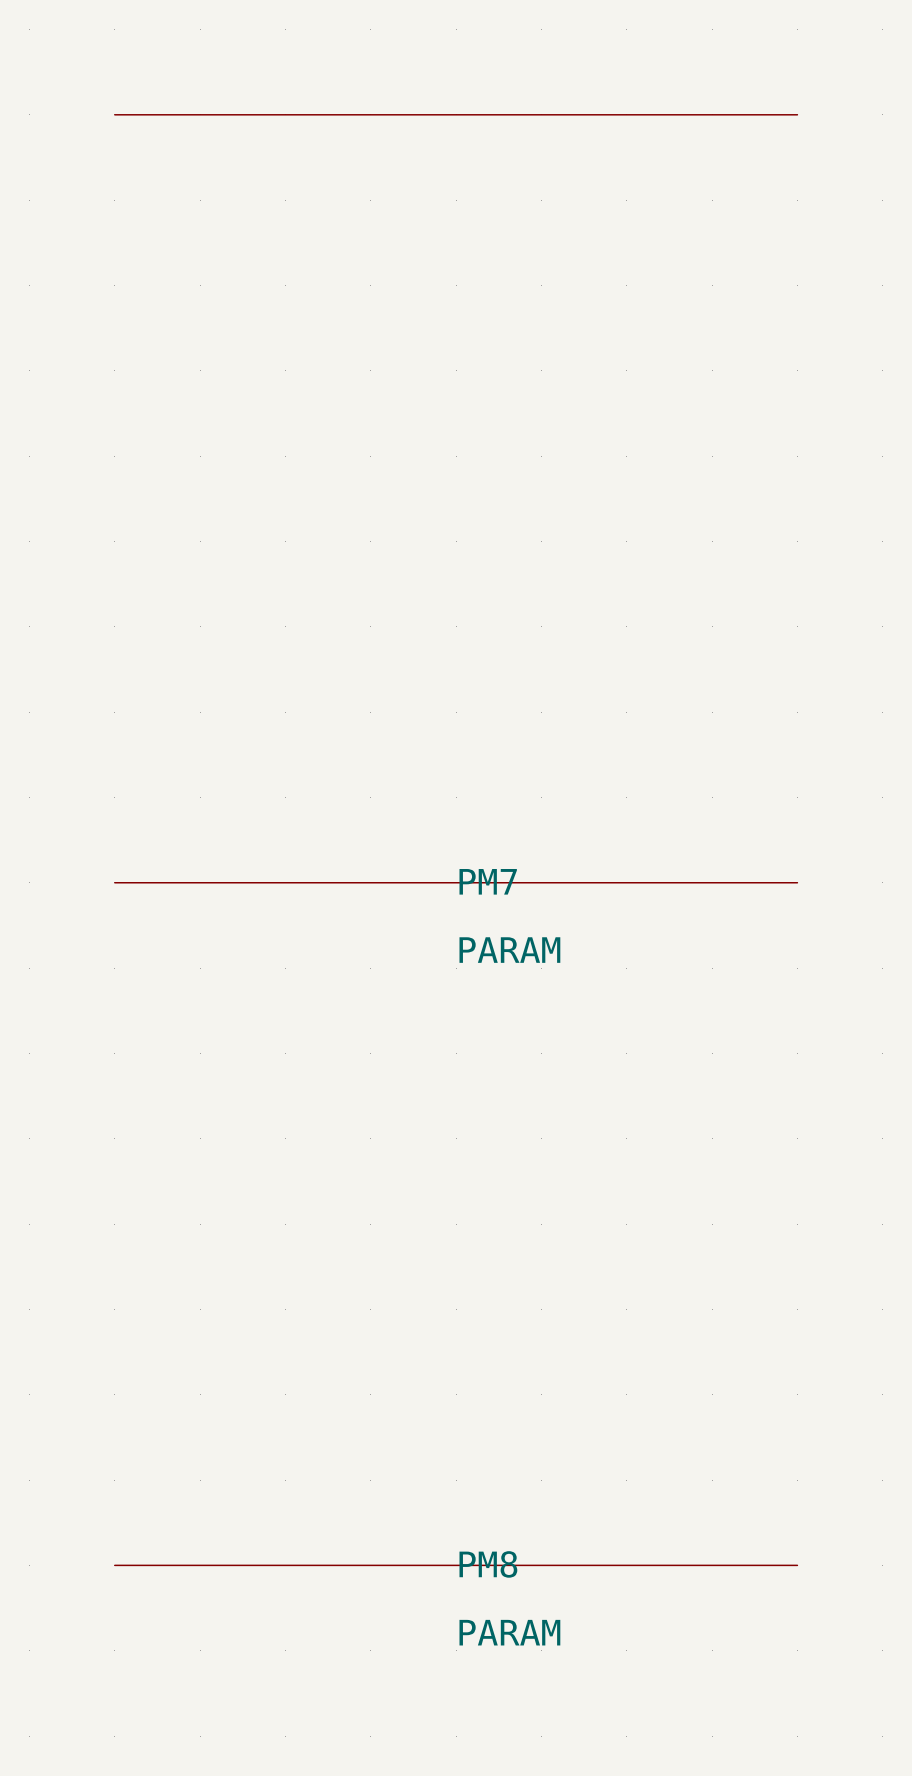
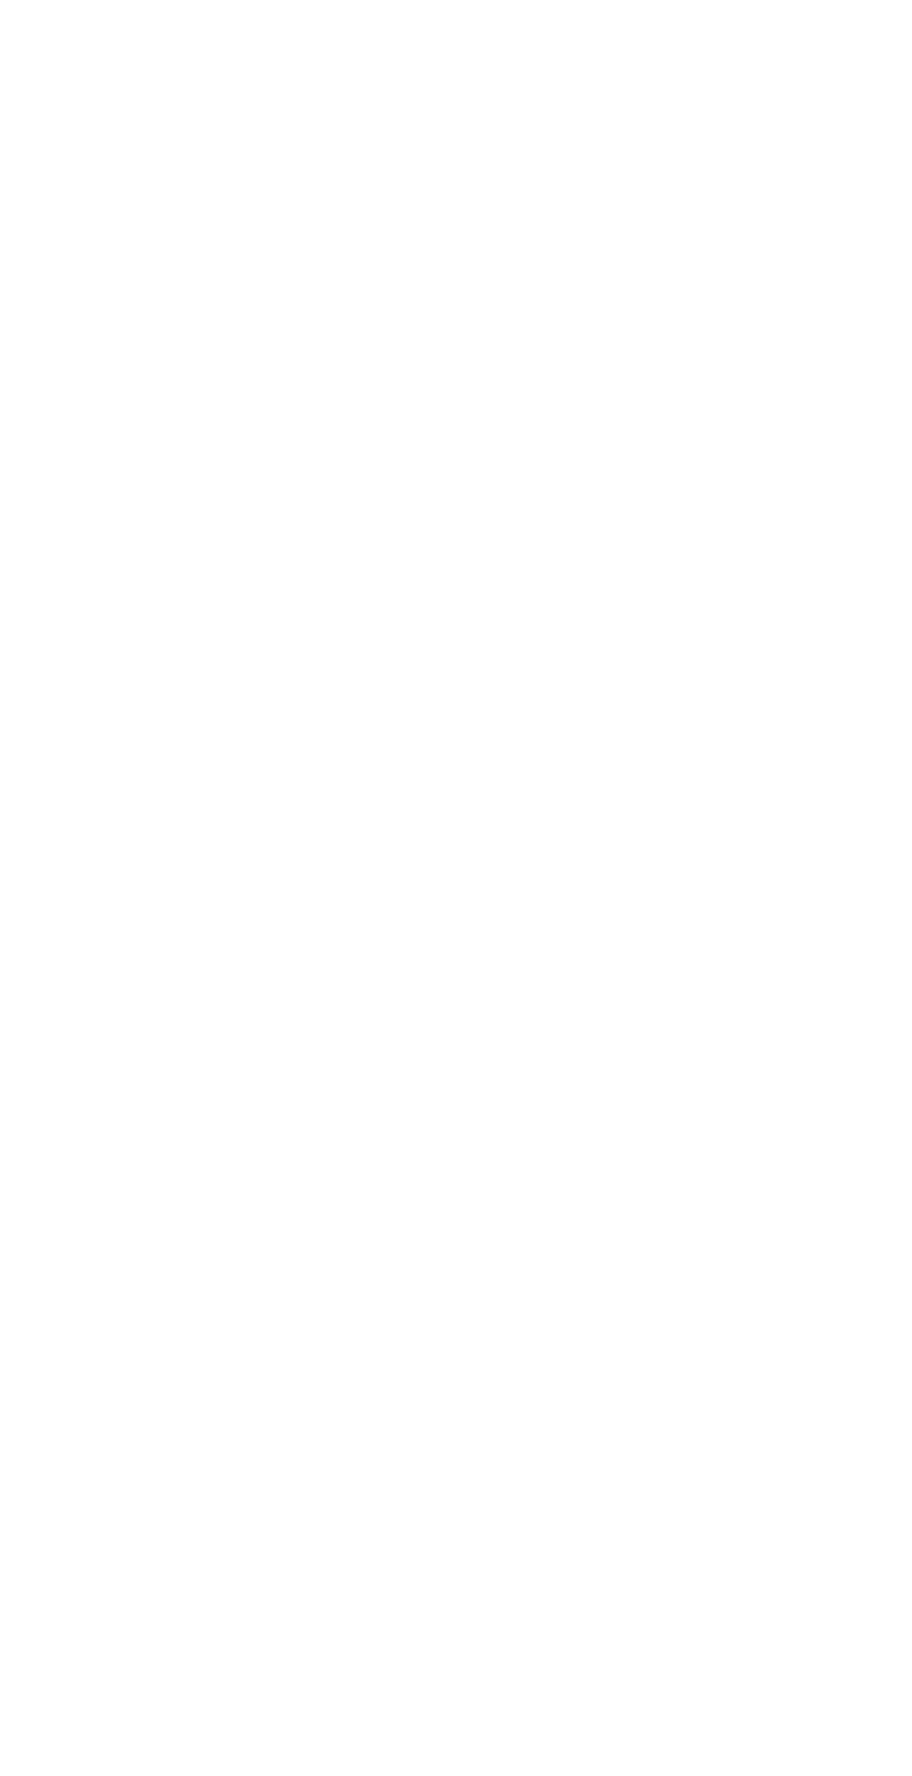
part: (456, 114) -> none
PM7: PARAM (456, 882) -> none
PM8: PARAM (456, 1565) -> none

